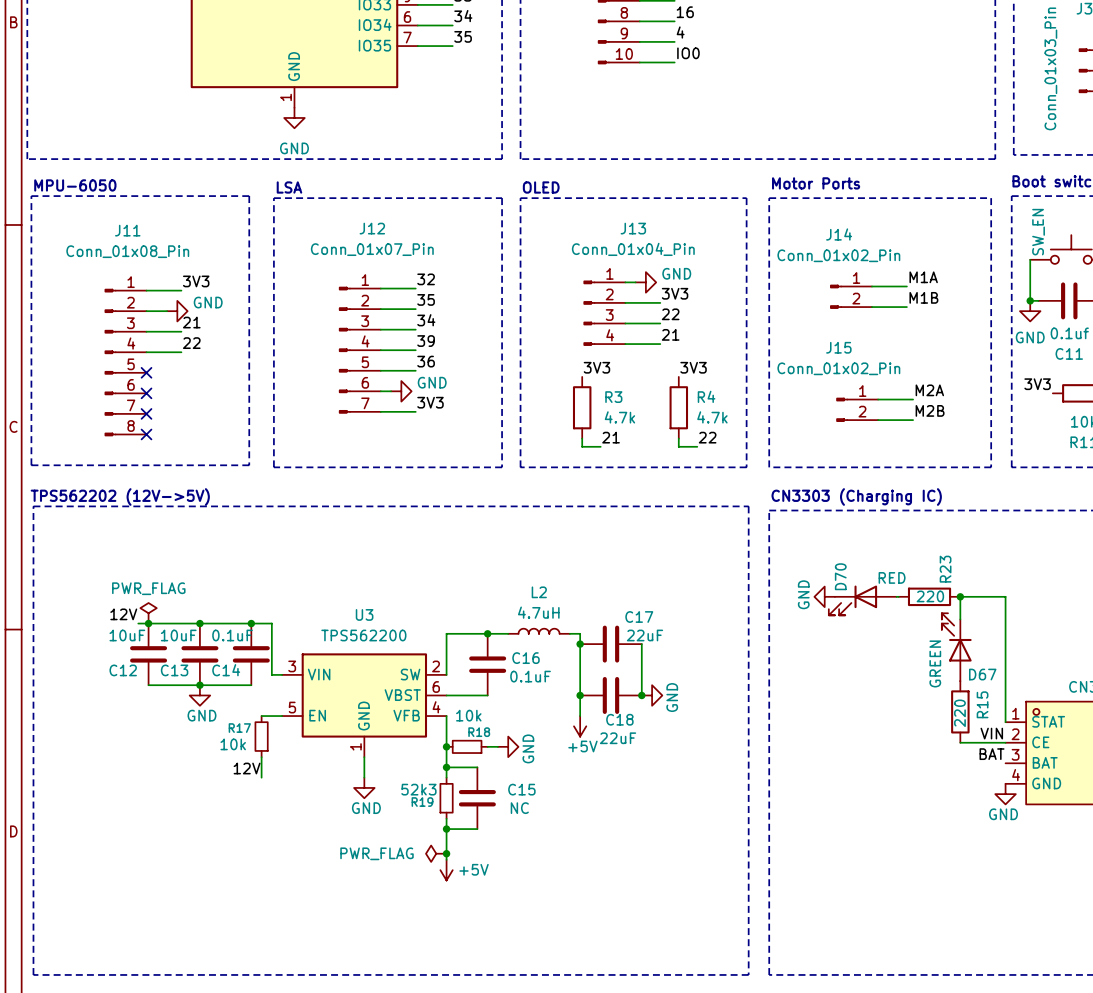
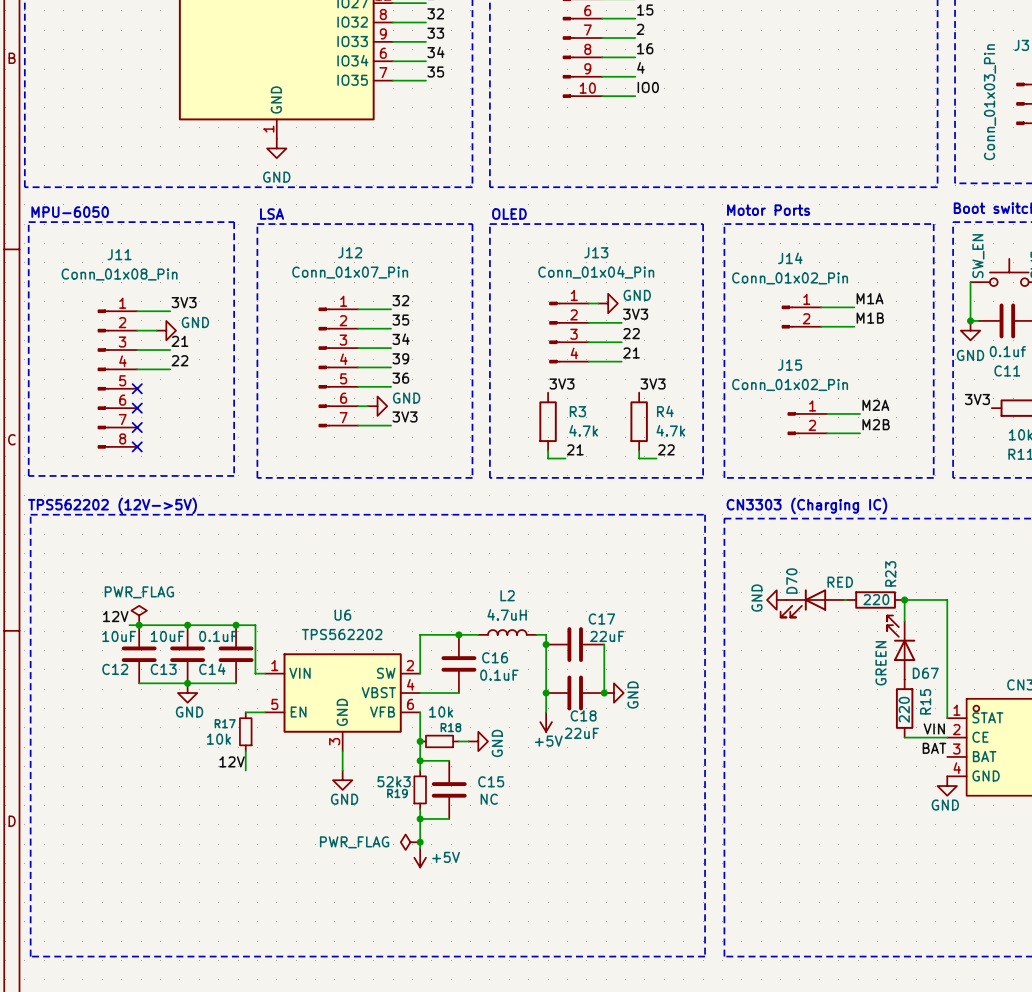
U3 name: U3 (364, 614) -> U6 (342, 615)
U3 value: TPS562200 (363, 635) -> TPS562202 (342, 634)
U3 pin number: 3 (292, 666) -> 1 (274, 665)
U3 pin number: 6 (436, 687) -> 4 (410, 684)
U3 pin number: 4 (436, 707) -> 6 (410, 704)
U3 pin number: 1 (355, 746) -> 3 (334, 741)

